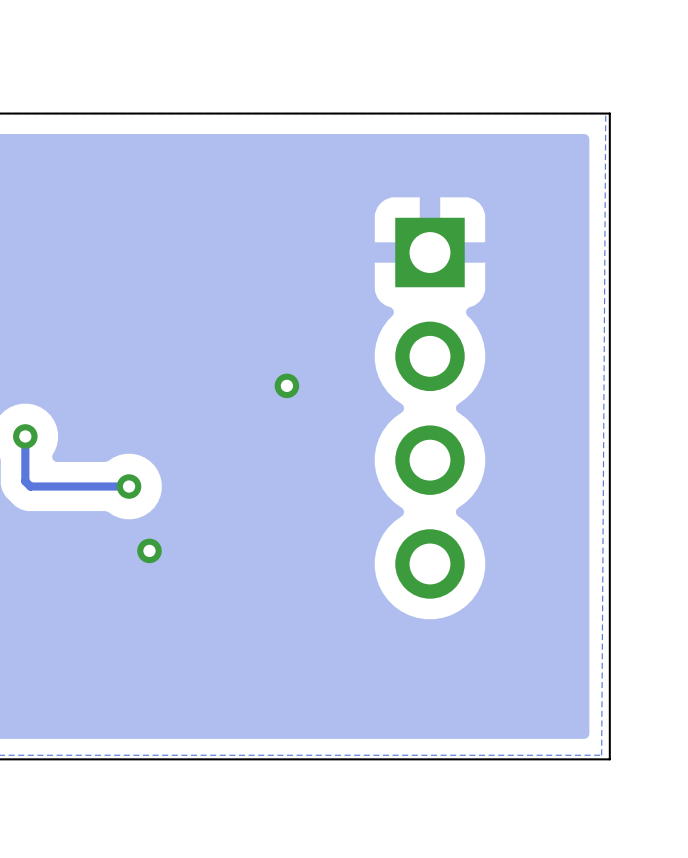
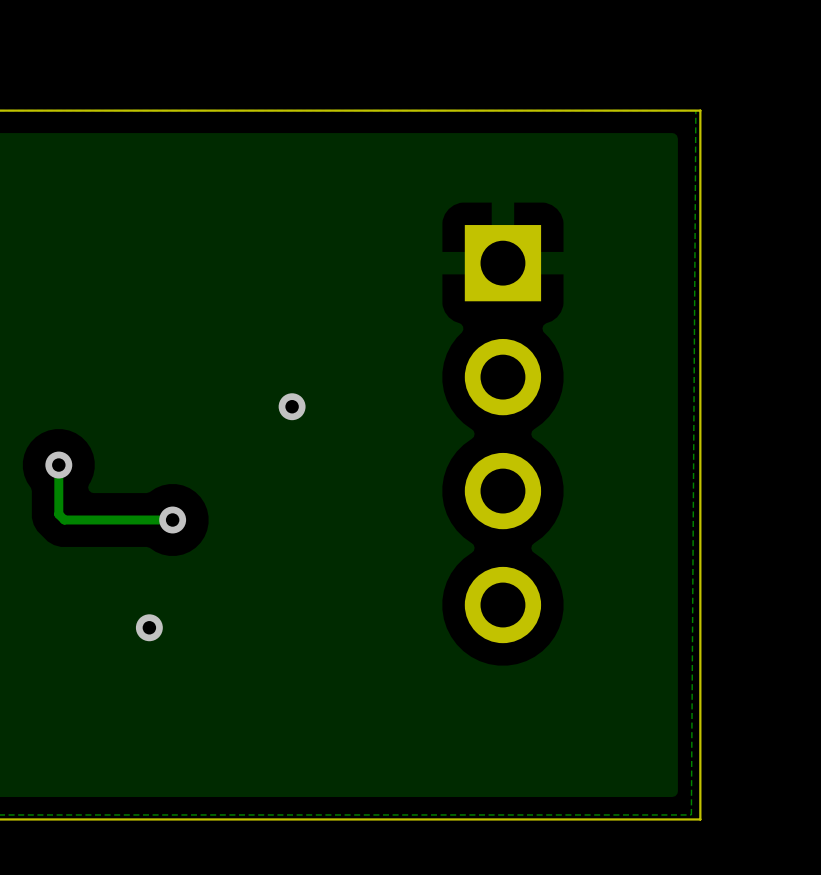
via position: (286, 385) -> (292, 406)
via position: (149, 550) -> (149, 627)

